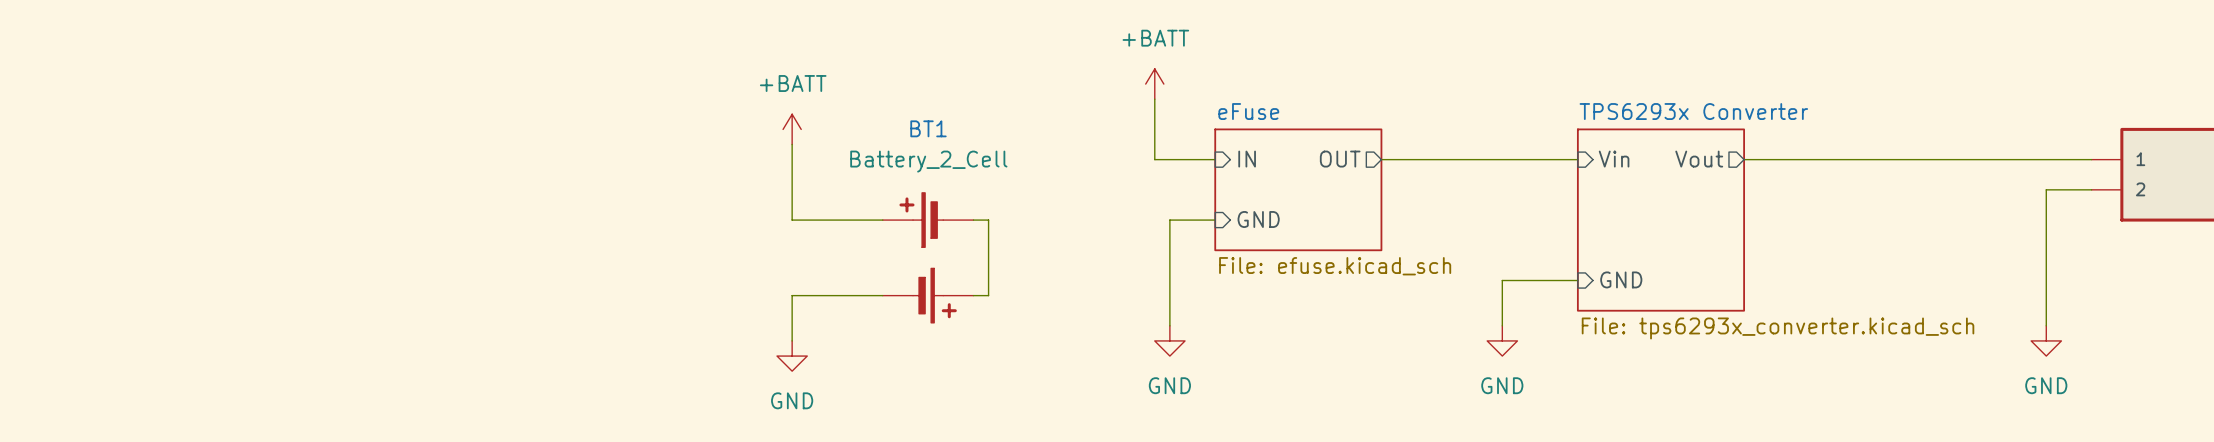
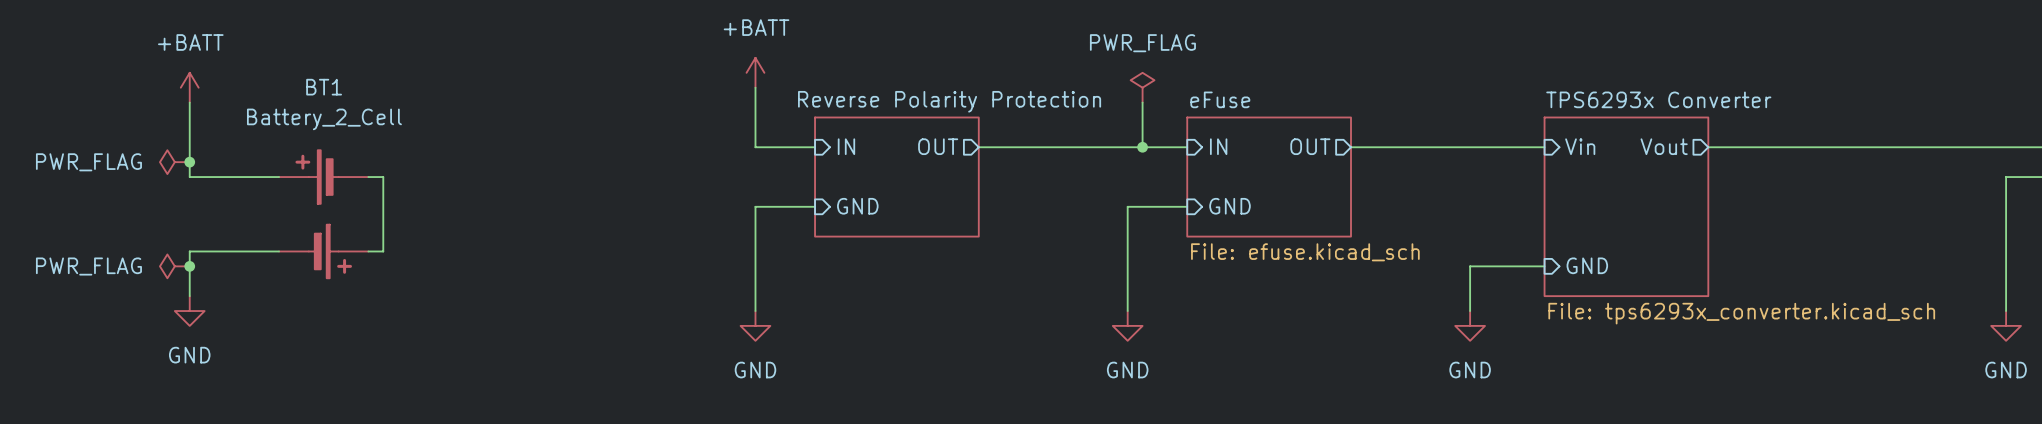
power symbol: +BATT (1154, 84) -> none
power symbol: none -> +BATT (189, 87)
wire: none -> (755, 87) (755, 147) (815, 147)
wire: (1154, 99) (1154, 159) -> (978, 147) (1127, 147)
power symbol: none -> PWR_FLAG (1142, 87)
wire: none -> (189, 102) (189, 177) (279, 177)
wire: none -> (1142, 102) (1142, 147)
power symbol position: +BATT (792, 129) -> +BATT (755, 72)
wire: (792, 144) (792, 220) -> (755, 311) (755, 206) (770, 206)
sheet pin: none -> IN (846, 146)
sheet pin: none -> OUT (938, 146)
junction: none -> (1142, 147)
power symbol: none -> PWR_FLAG (174, 162)
junction: none -> (189, 162)
wire: none -> (368, 177) (383, 177) (383, 251) (368, 251)
sheet Reverse Polarity Protection: none -> (896, 177)
sheet pin: none -> GND (857, 206)
wire: (837, 220) (882, 220) -> none
wire: (973, 220) (988, 220) (988, 295) (973, 295) -> none
wire: (1169, 220) (1169, 325) -> (1142, 206) (1127, 206) (1127, 311)
BT1 position: (928, 257) -> (323, 214)
wire: none -> (279, 251) (189, 251) (189, 296)
power symbol: none -> PWR_FLAG (174, 266)
junction: none -> (189, 266)
wire: (882, 295) (792, 295) (792, 340) -> none
power symbol: none -> GND (189, 311)
power symbol position: GND (1169, 340) -> GND (1127, 325)
power symbol position: GND (792, 356) -> GND (755, 325)

